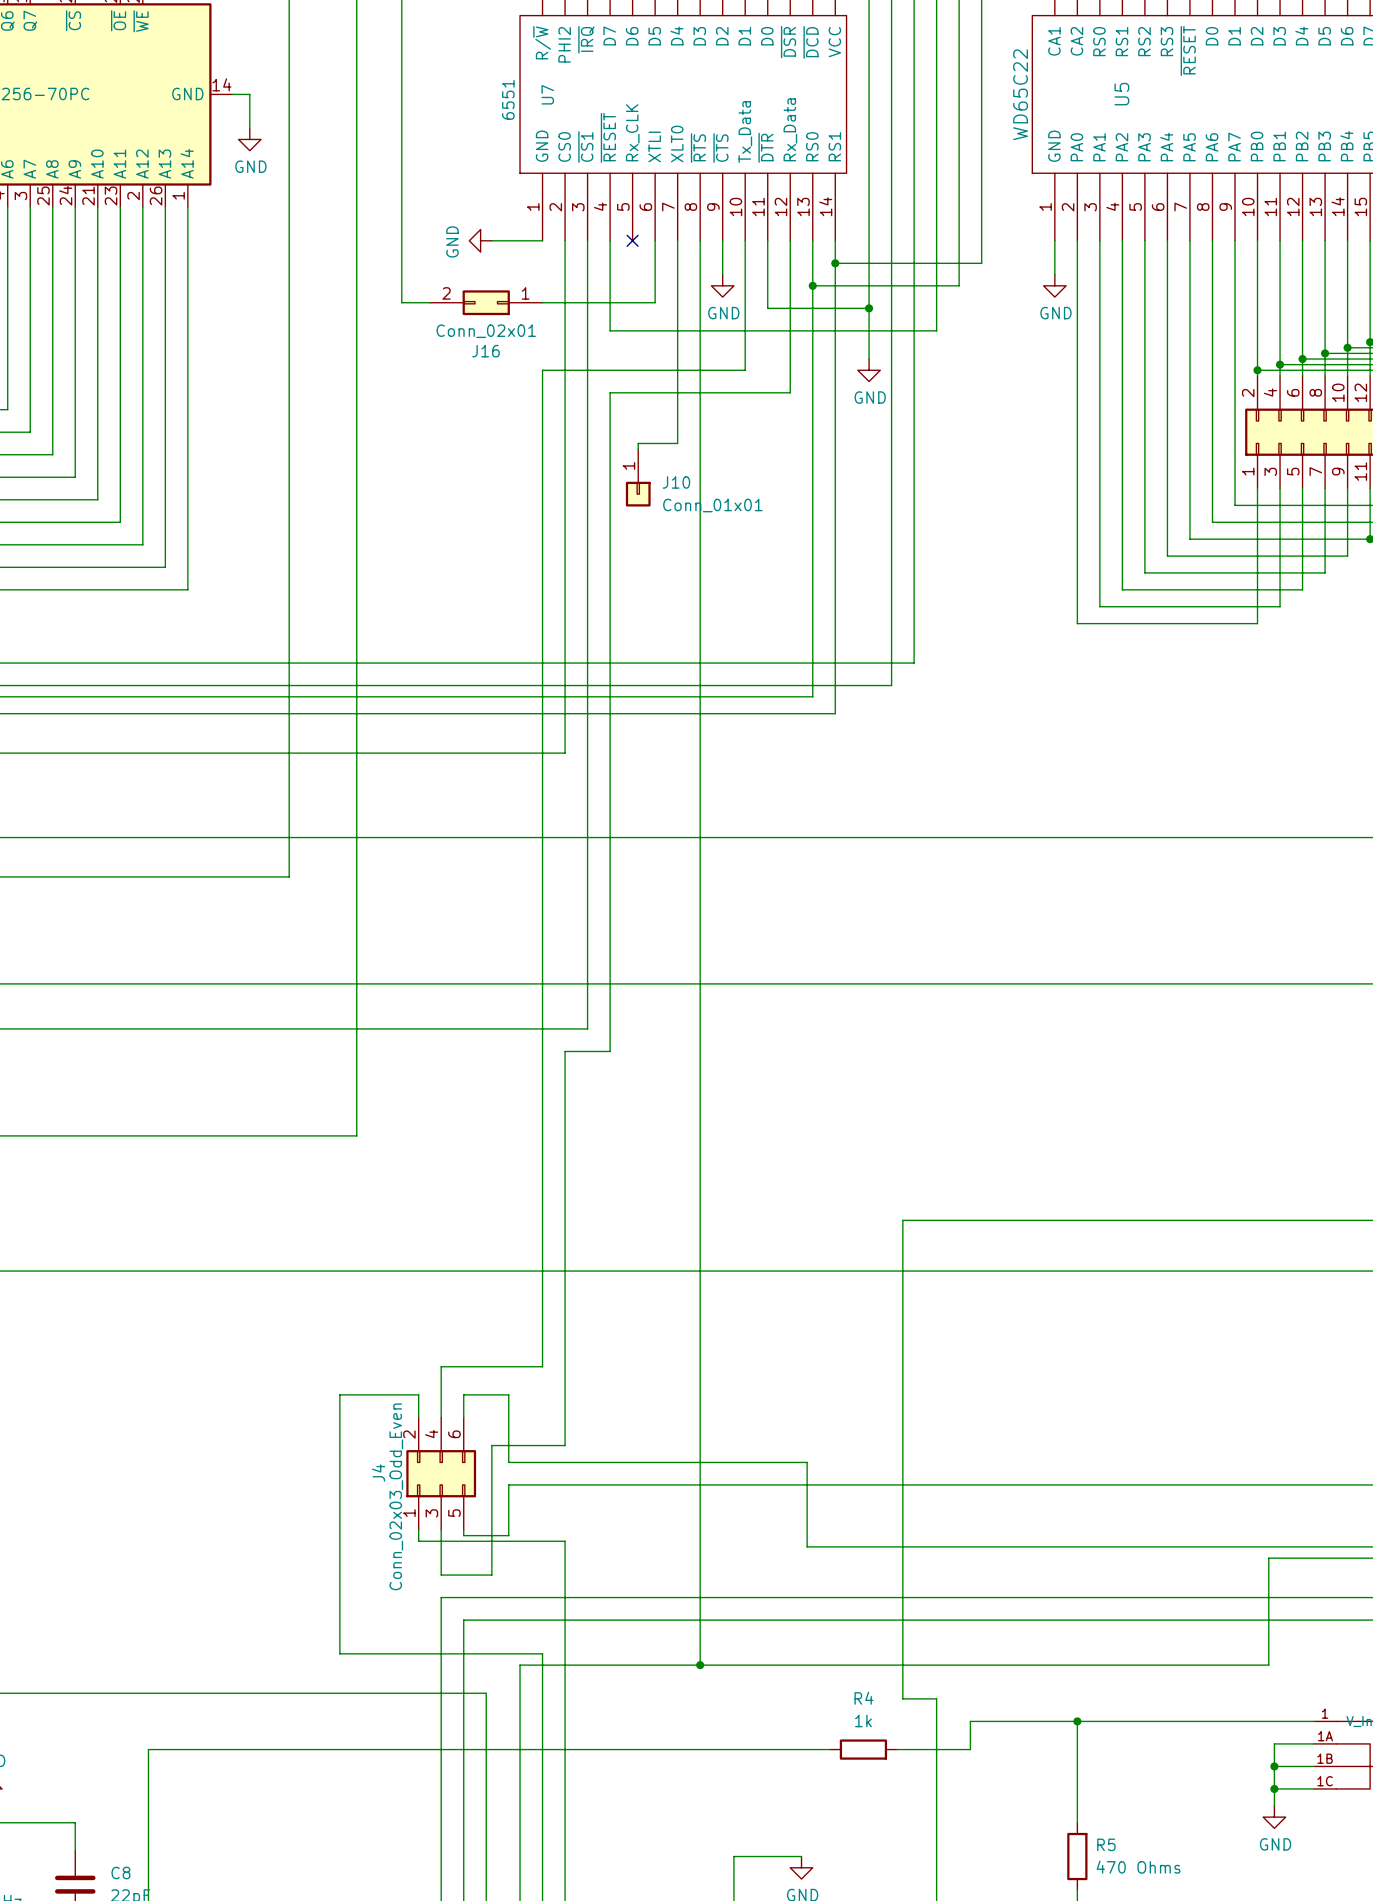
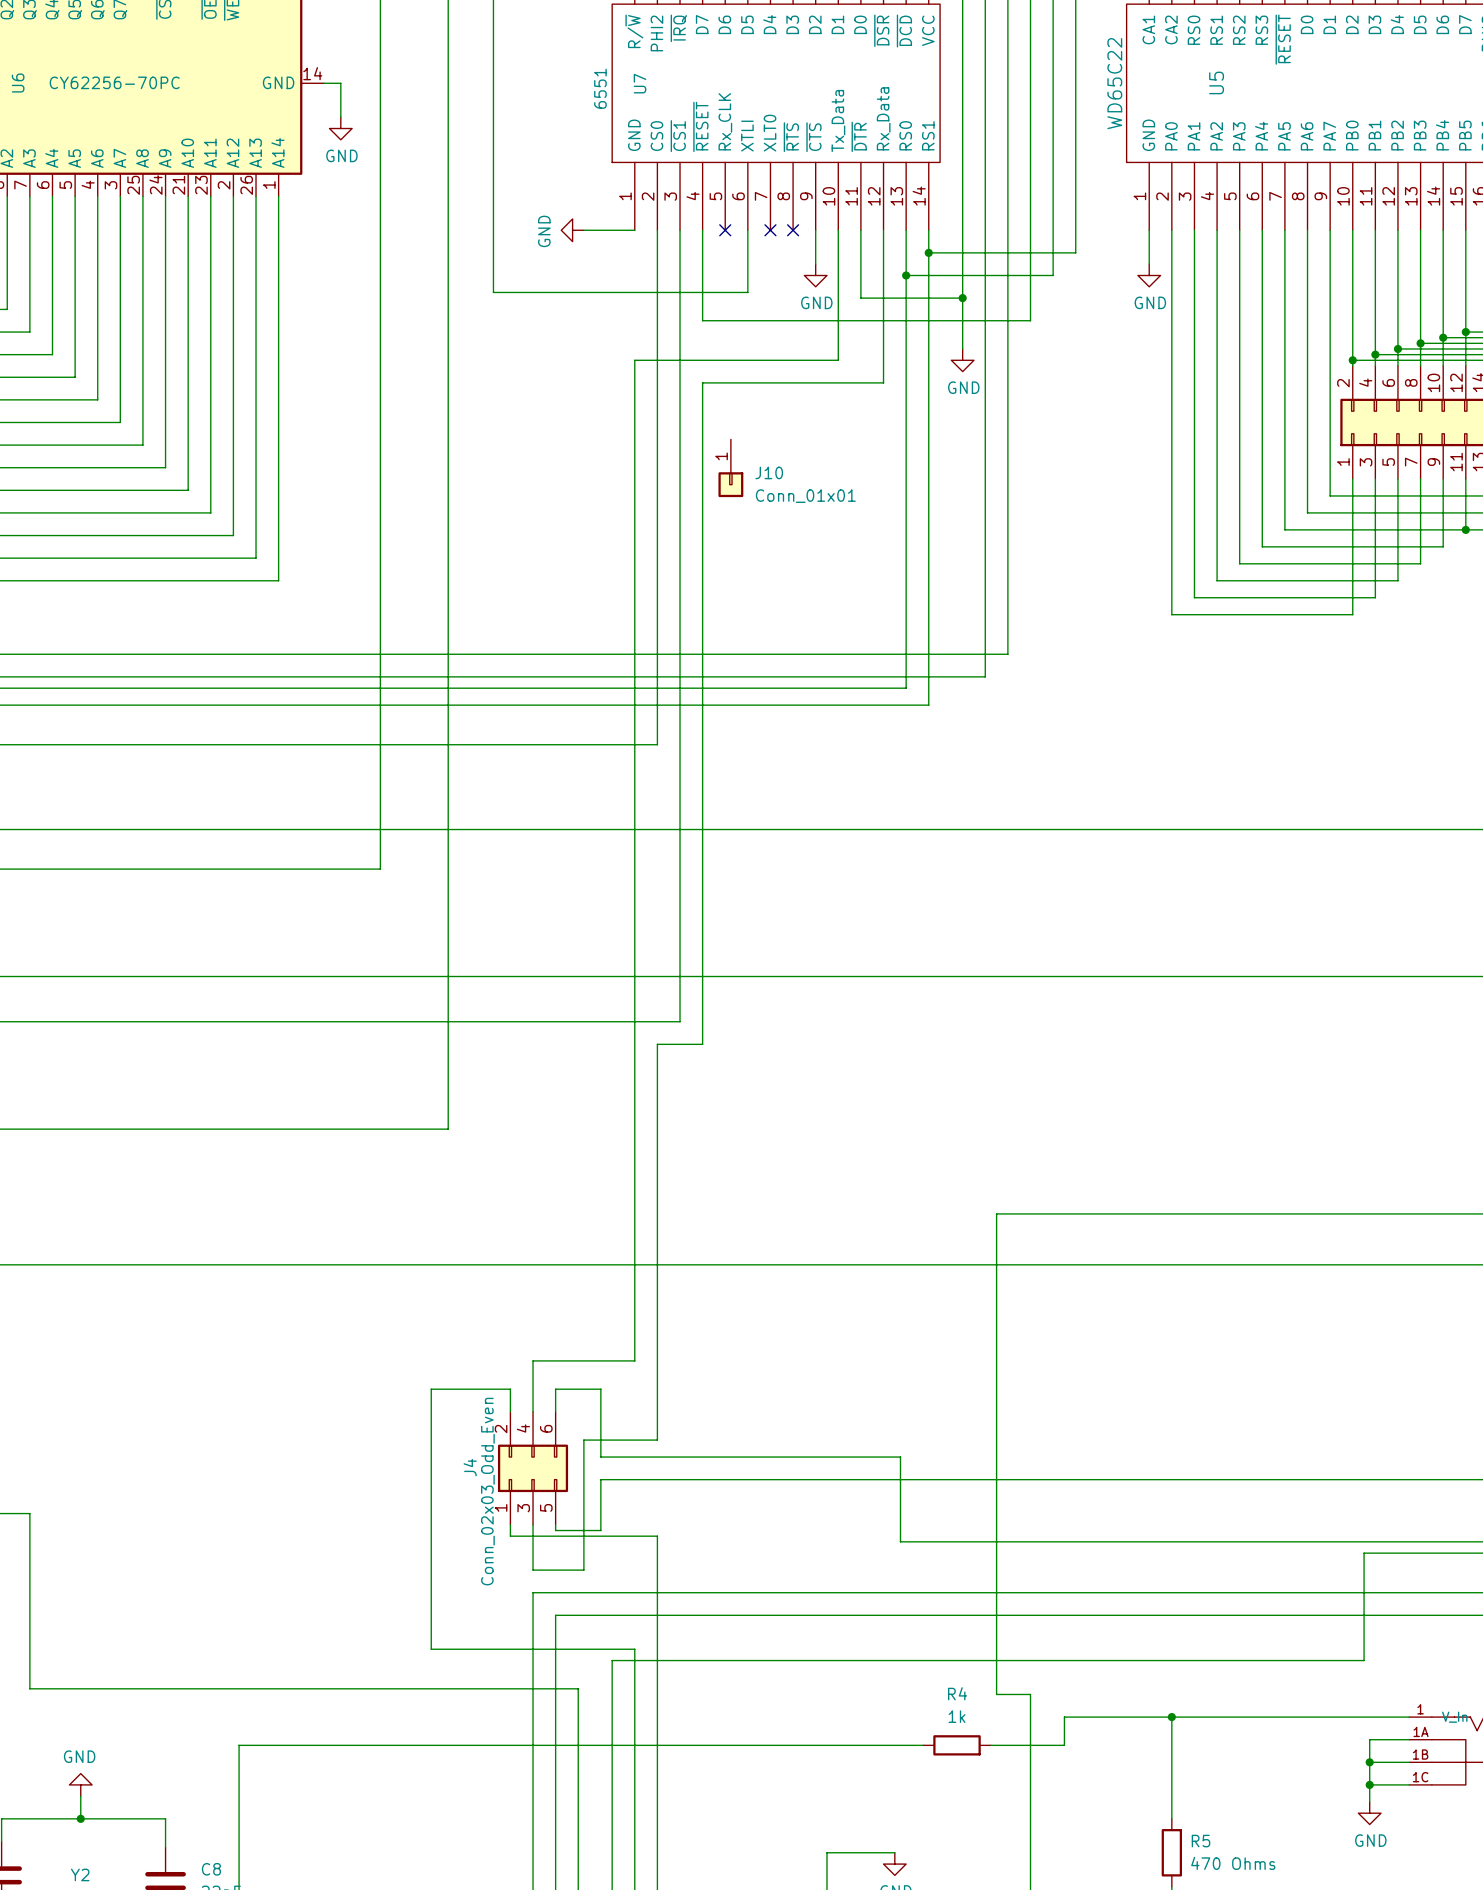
wire: (677, 240) (677, 443) (638, 443) (638, 449) -> none
no-connect mark: none -> (770, 230)
wire: (700, 240) (700, 1665) -> none
no-connect mark: none -> (793, 230)
J16: Conn_02x01 (486, 302) -> none
junction: (700, 1665) -> none

